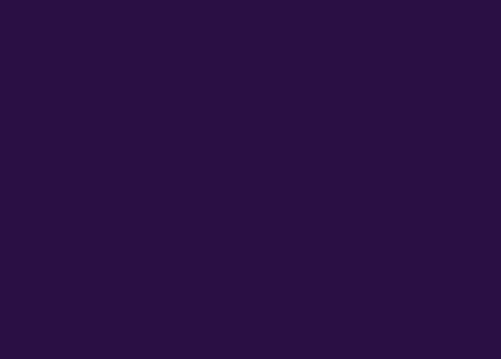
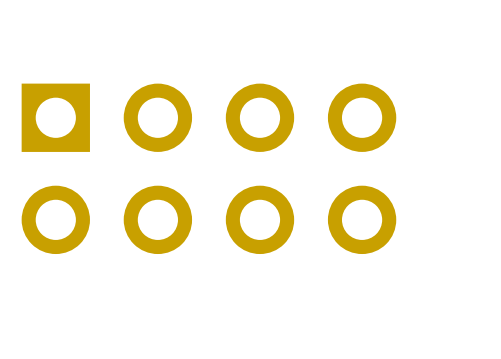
part: none -> (208, 168)

